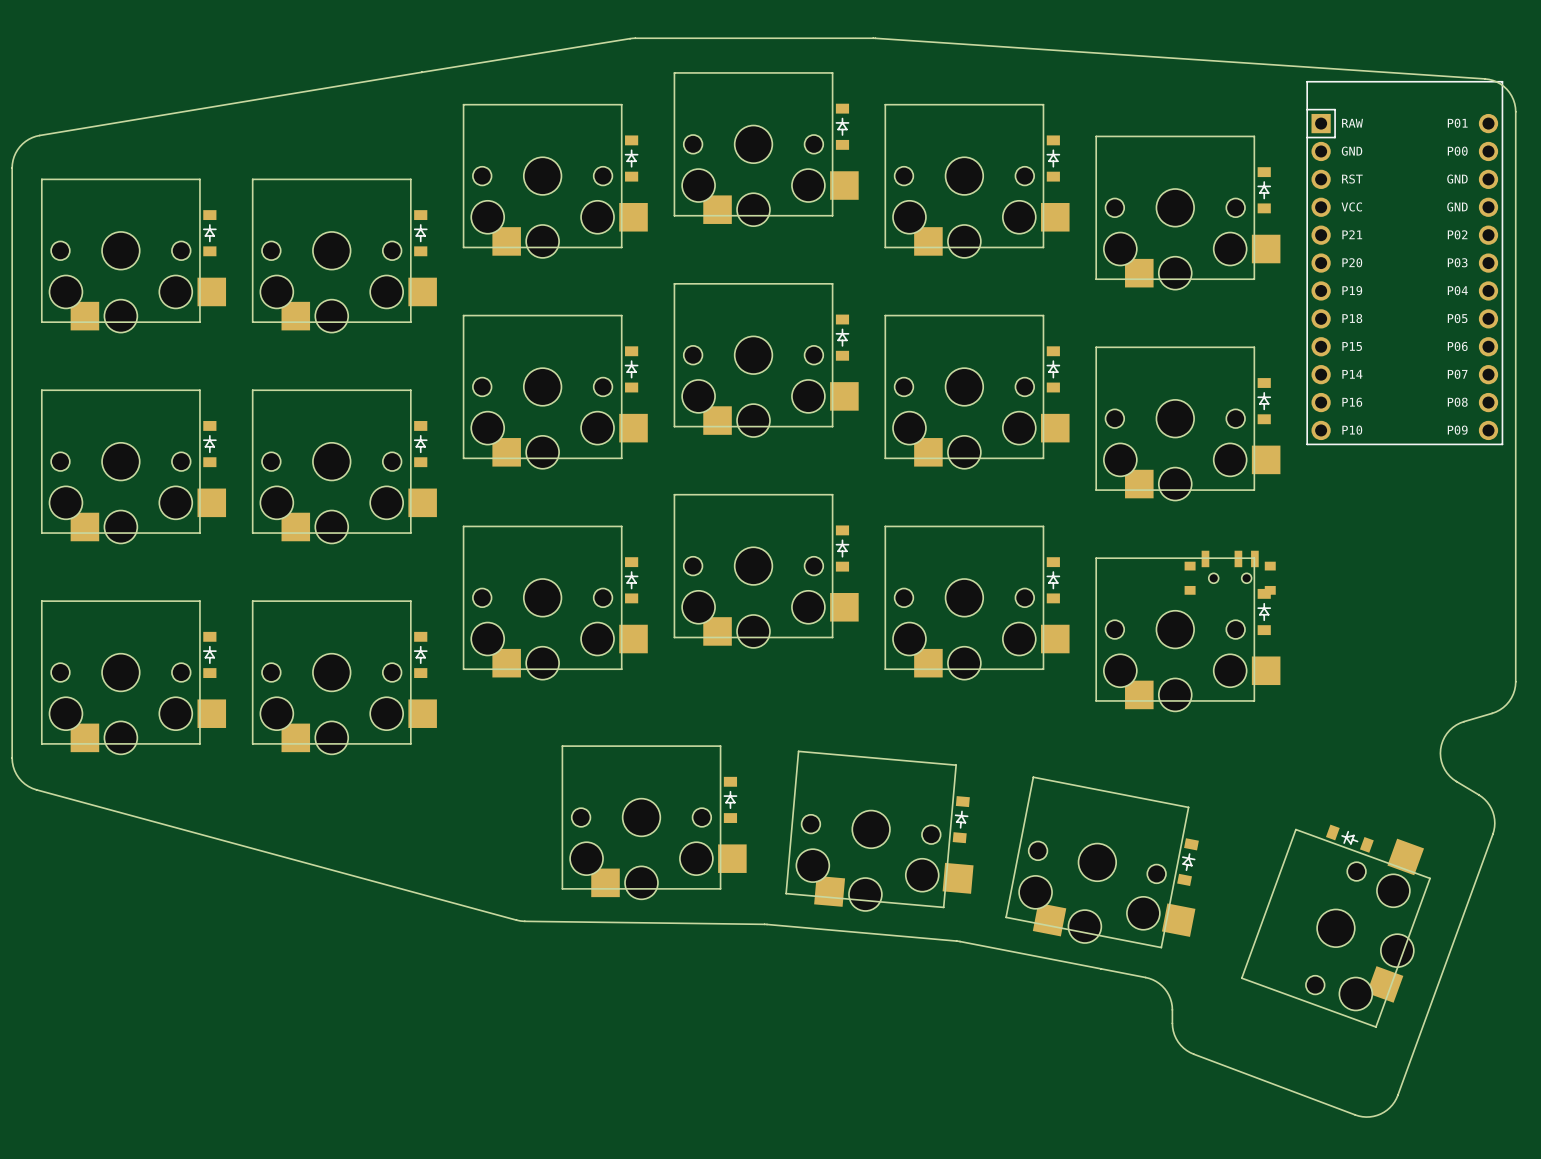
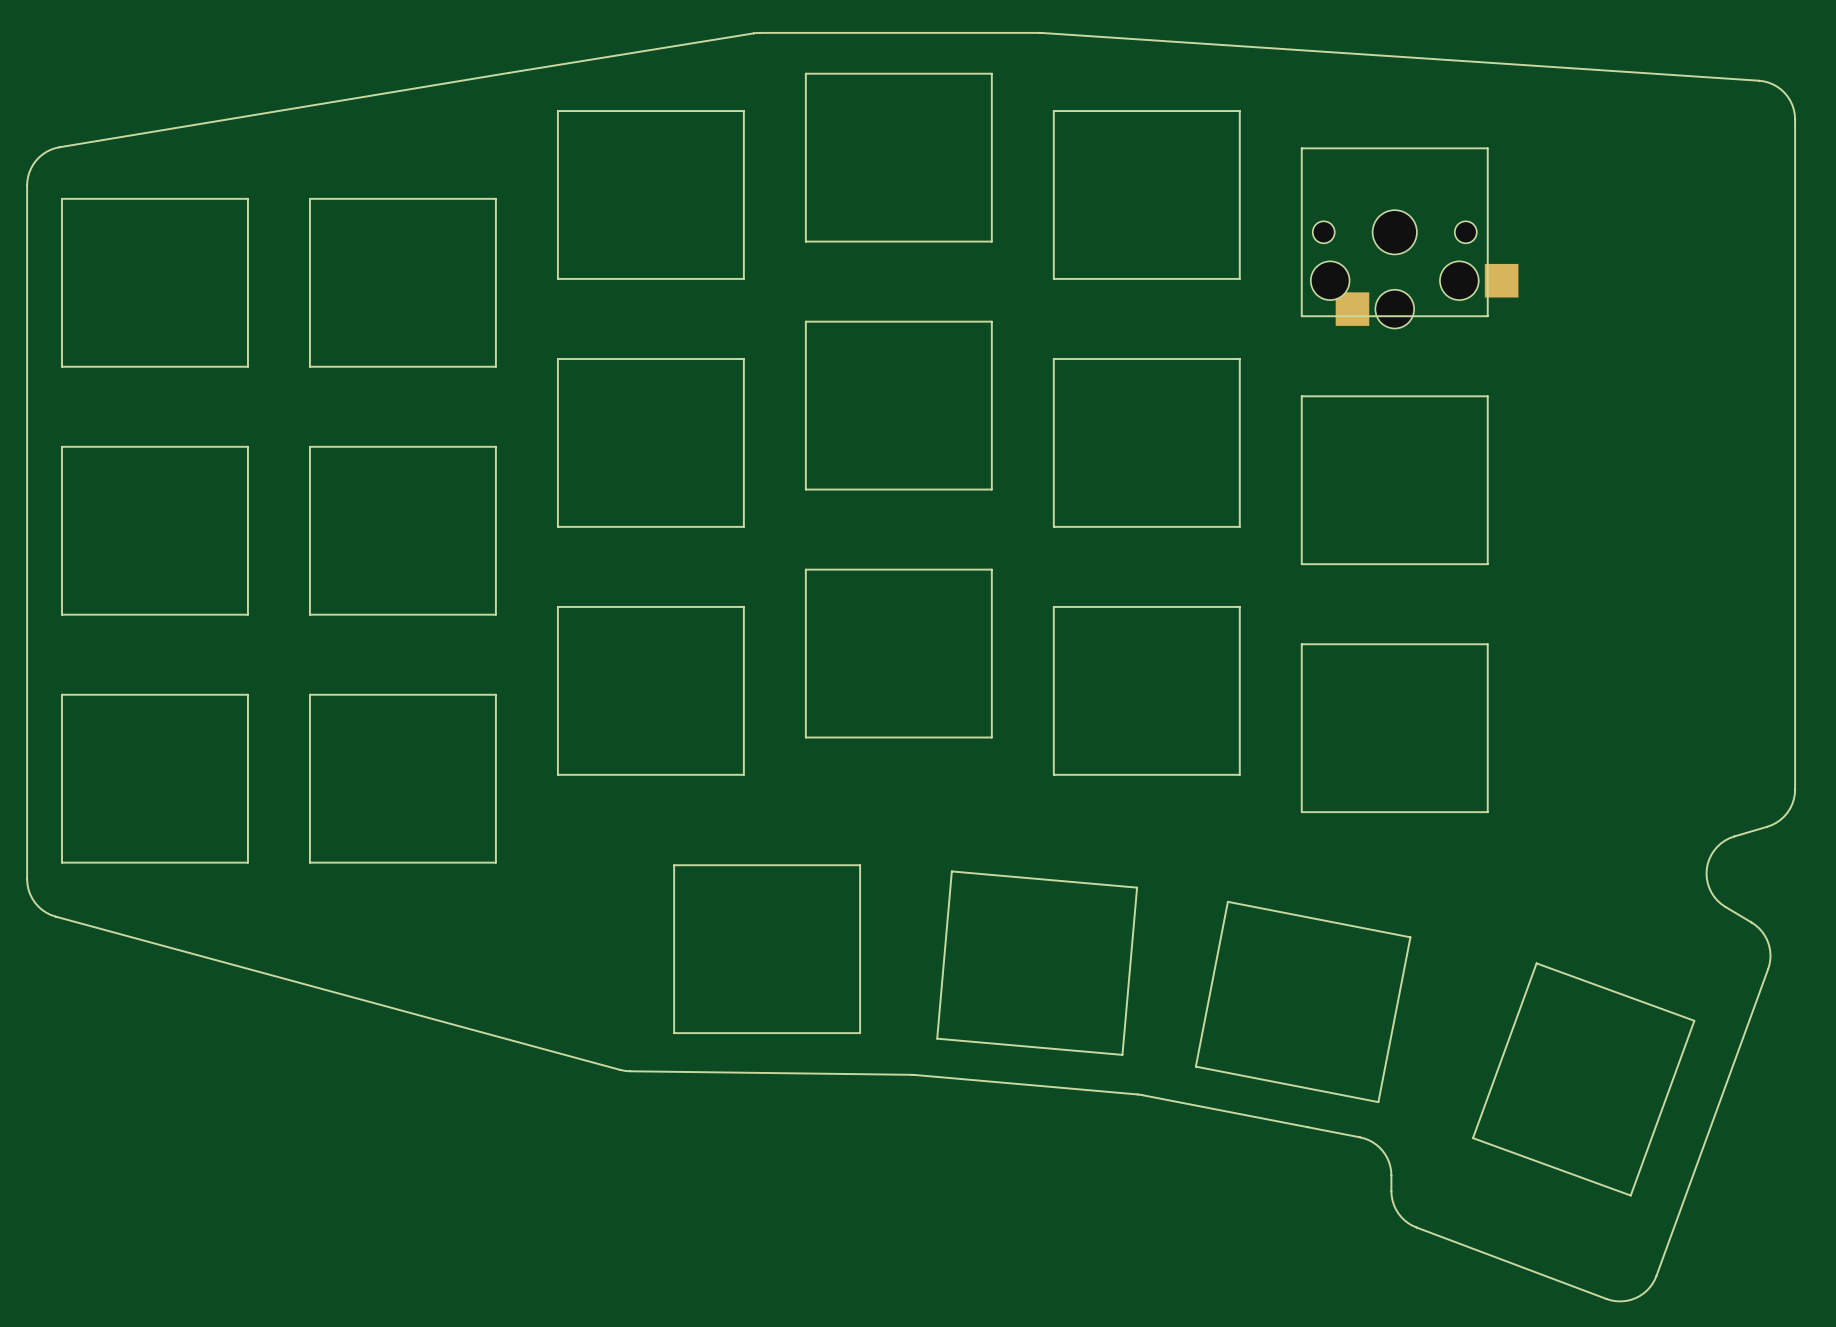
part: (842, 126) -> none
part: (631, 158) -> none
part: (1053, 158) -> none
part: (770, 175) -> none
part: (1264, 190) -> none
part: (559, 207) -> none
part: (981, 207) -> none
part: (209, 233) -> none
part: (420, 233) -> none
part: (1404, 263) -> none
part: (137, 282) -> none
part: (348, 282) -> none
part: (842, 337) -> none
part: (631, 369) -> none
part: (1053, 369) -> none
part: (770, 386) -> none
part: (1264, 401) -> none
part: (559, 418) -> none
part: (981, 418) -> none
part: (209, 444) -> none
part: (420, 444) -> none
part: (1192, 450) -> none
part: (137, 493) -> none
part: (348, 493) -> none
part: (842, 548) -> none
part: (1230, 572) -> none
part: (631, 580) -> none
part: (1053, 580) -> none
part: (770, 597) -> none
part: (1264, 612) -> none
part: (559, 629) -> none
part: (981, 629) -> none
part: (209, 654) -> none
part: (420, 654) -> none
part: (1192, 661) -> none
part: (137, 704) -> none
part: (348, 704) -> none
part: (730, 799) -> none
part: (961, 819) -> none
part: (1349, 838) -> none
part: (658, 848) -> none
part: (884, 860) -> none
part: (1188, 862) -> none
part: (1107, 892) -> none
part: (1364, 924) -> none

